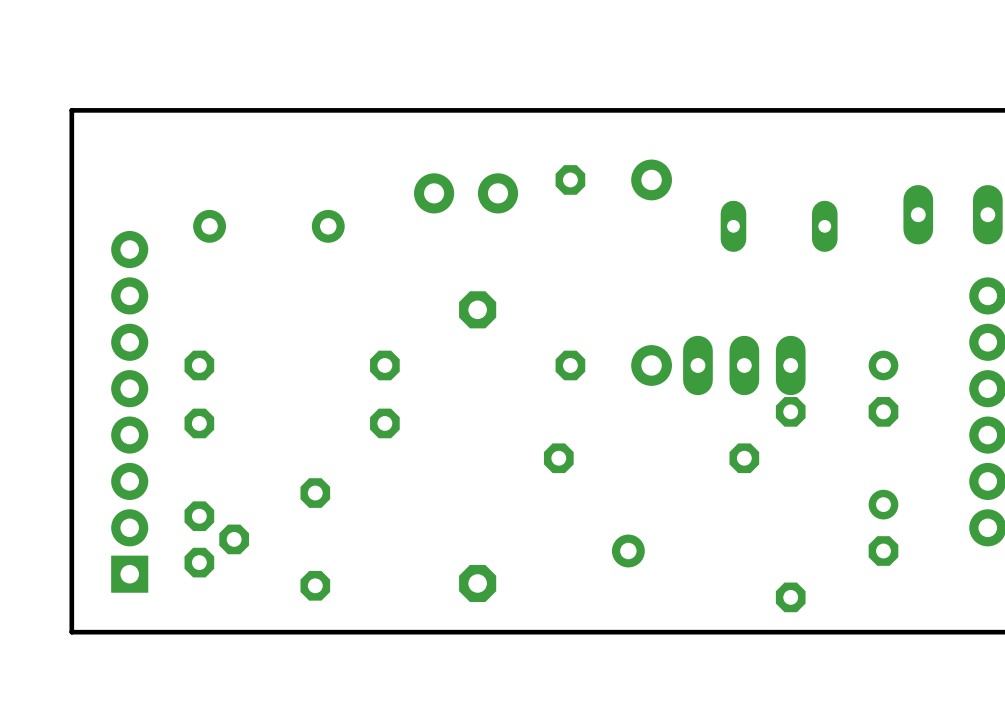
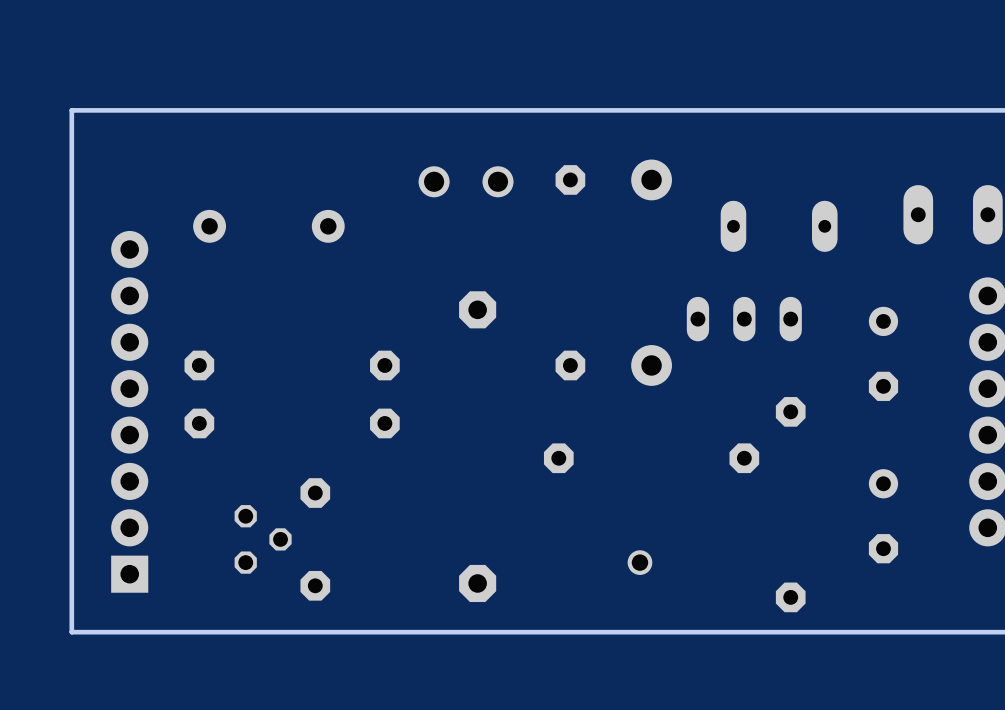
part footprint: [414, 173, 519, 214] -> [418, 166, 514, 198]
part: none -> (744, 319)
part: none -> (883, 353)
part: (744, 365) -> none
part: (883, 388) -> none
part footprint: [868, 489, 899, 566] -> [868, 469, 899, 564]
part footprint: [611, 534, 645, 568] -> [627, 550, 653, 575]
part: (216, 539) -> none
part: none -> (263, 539)

